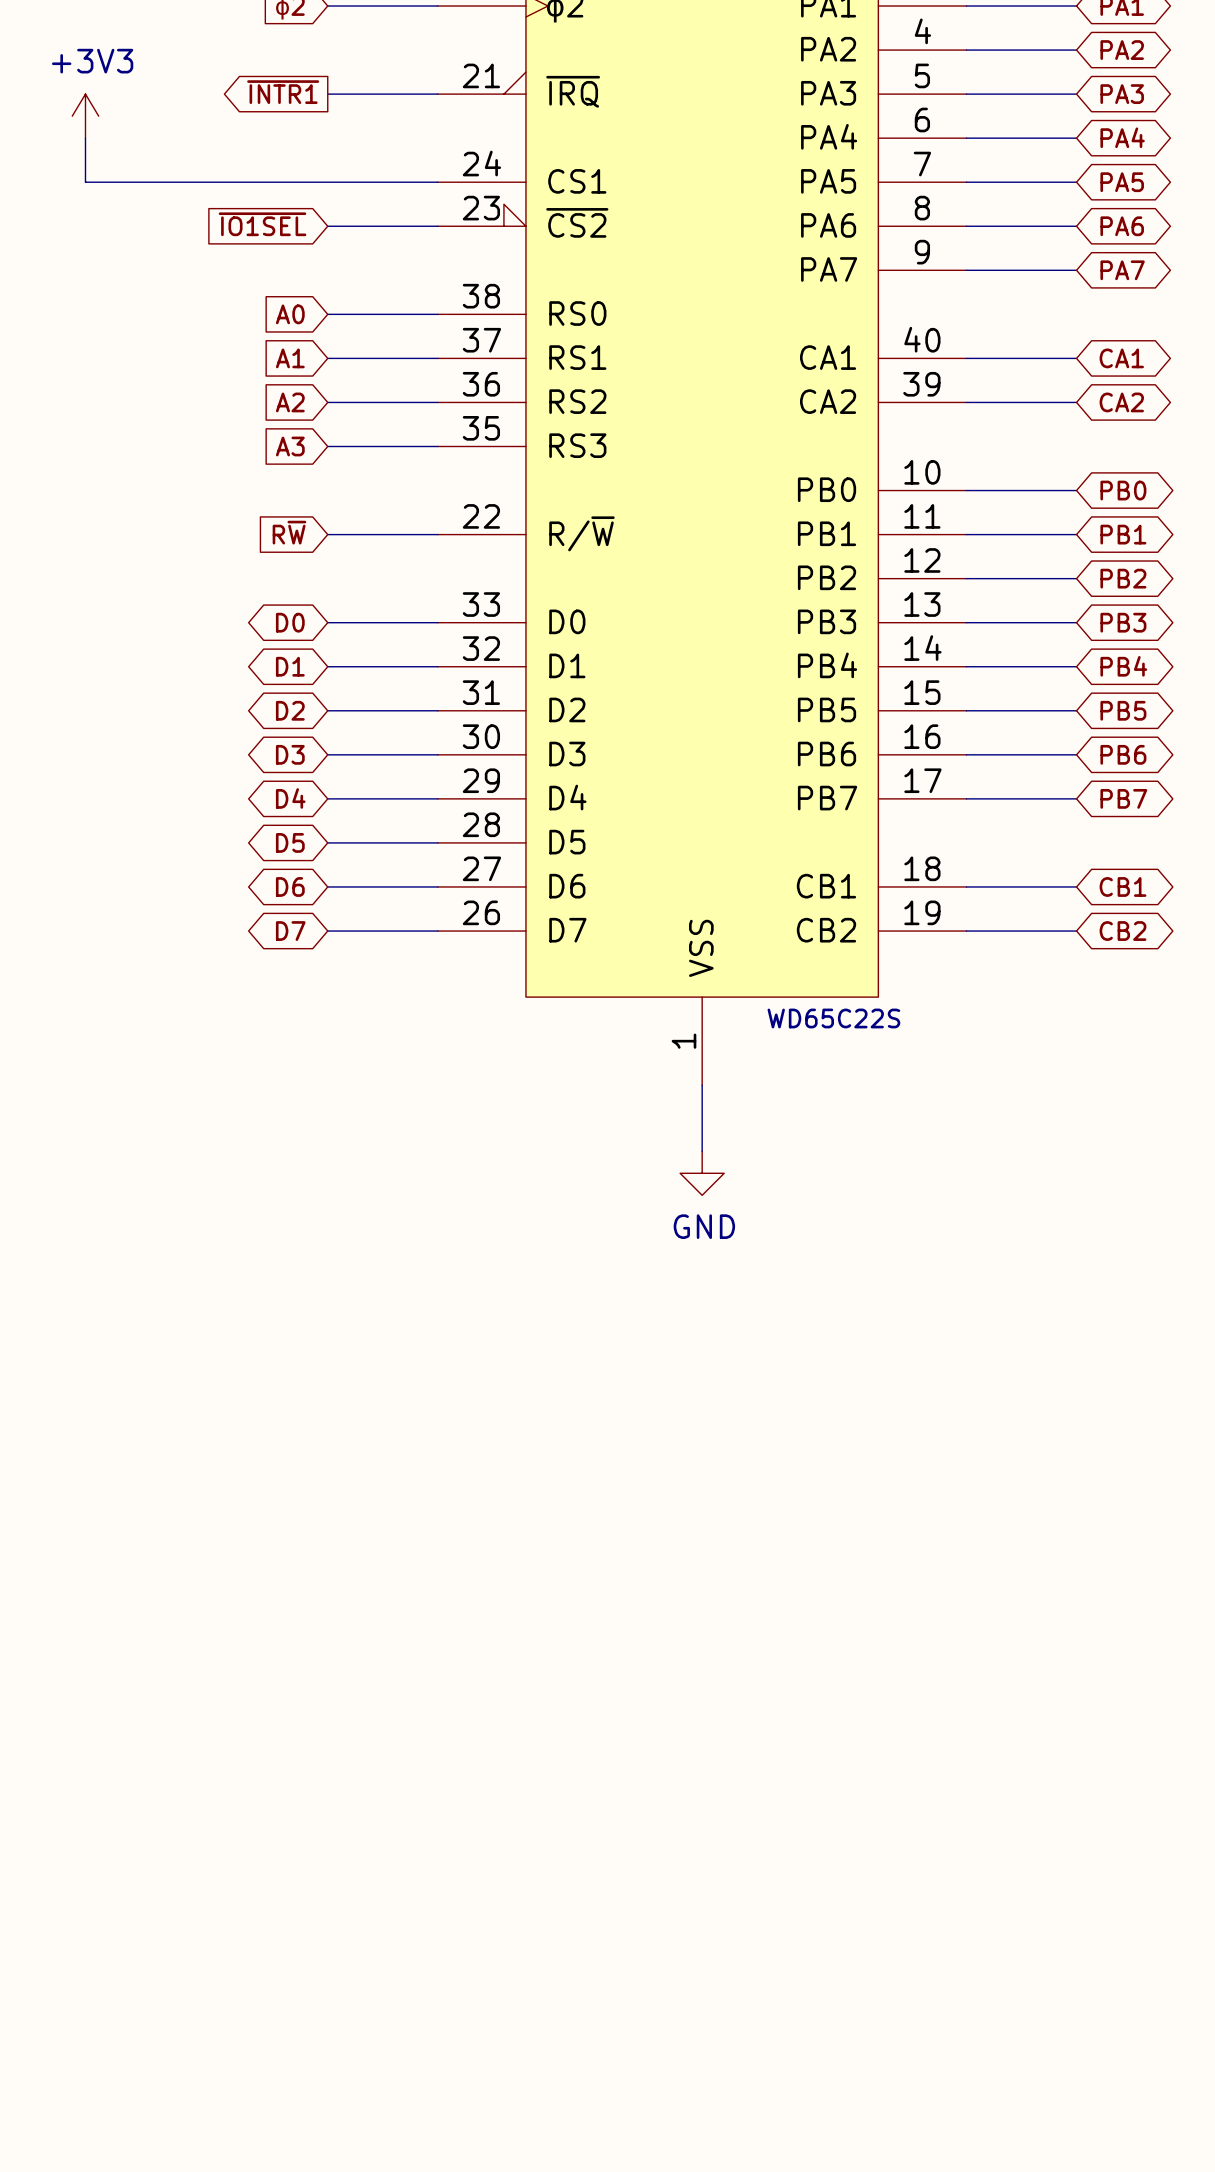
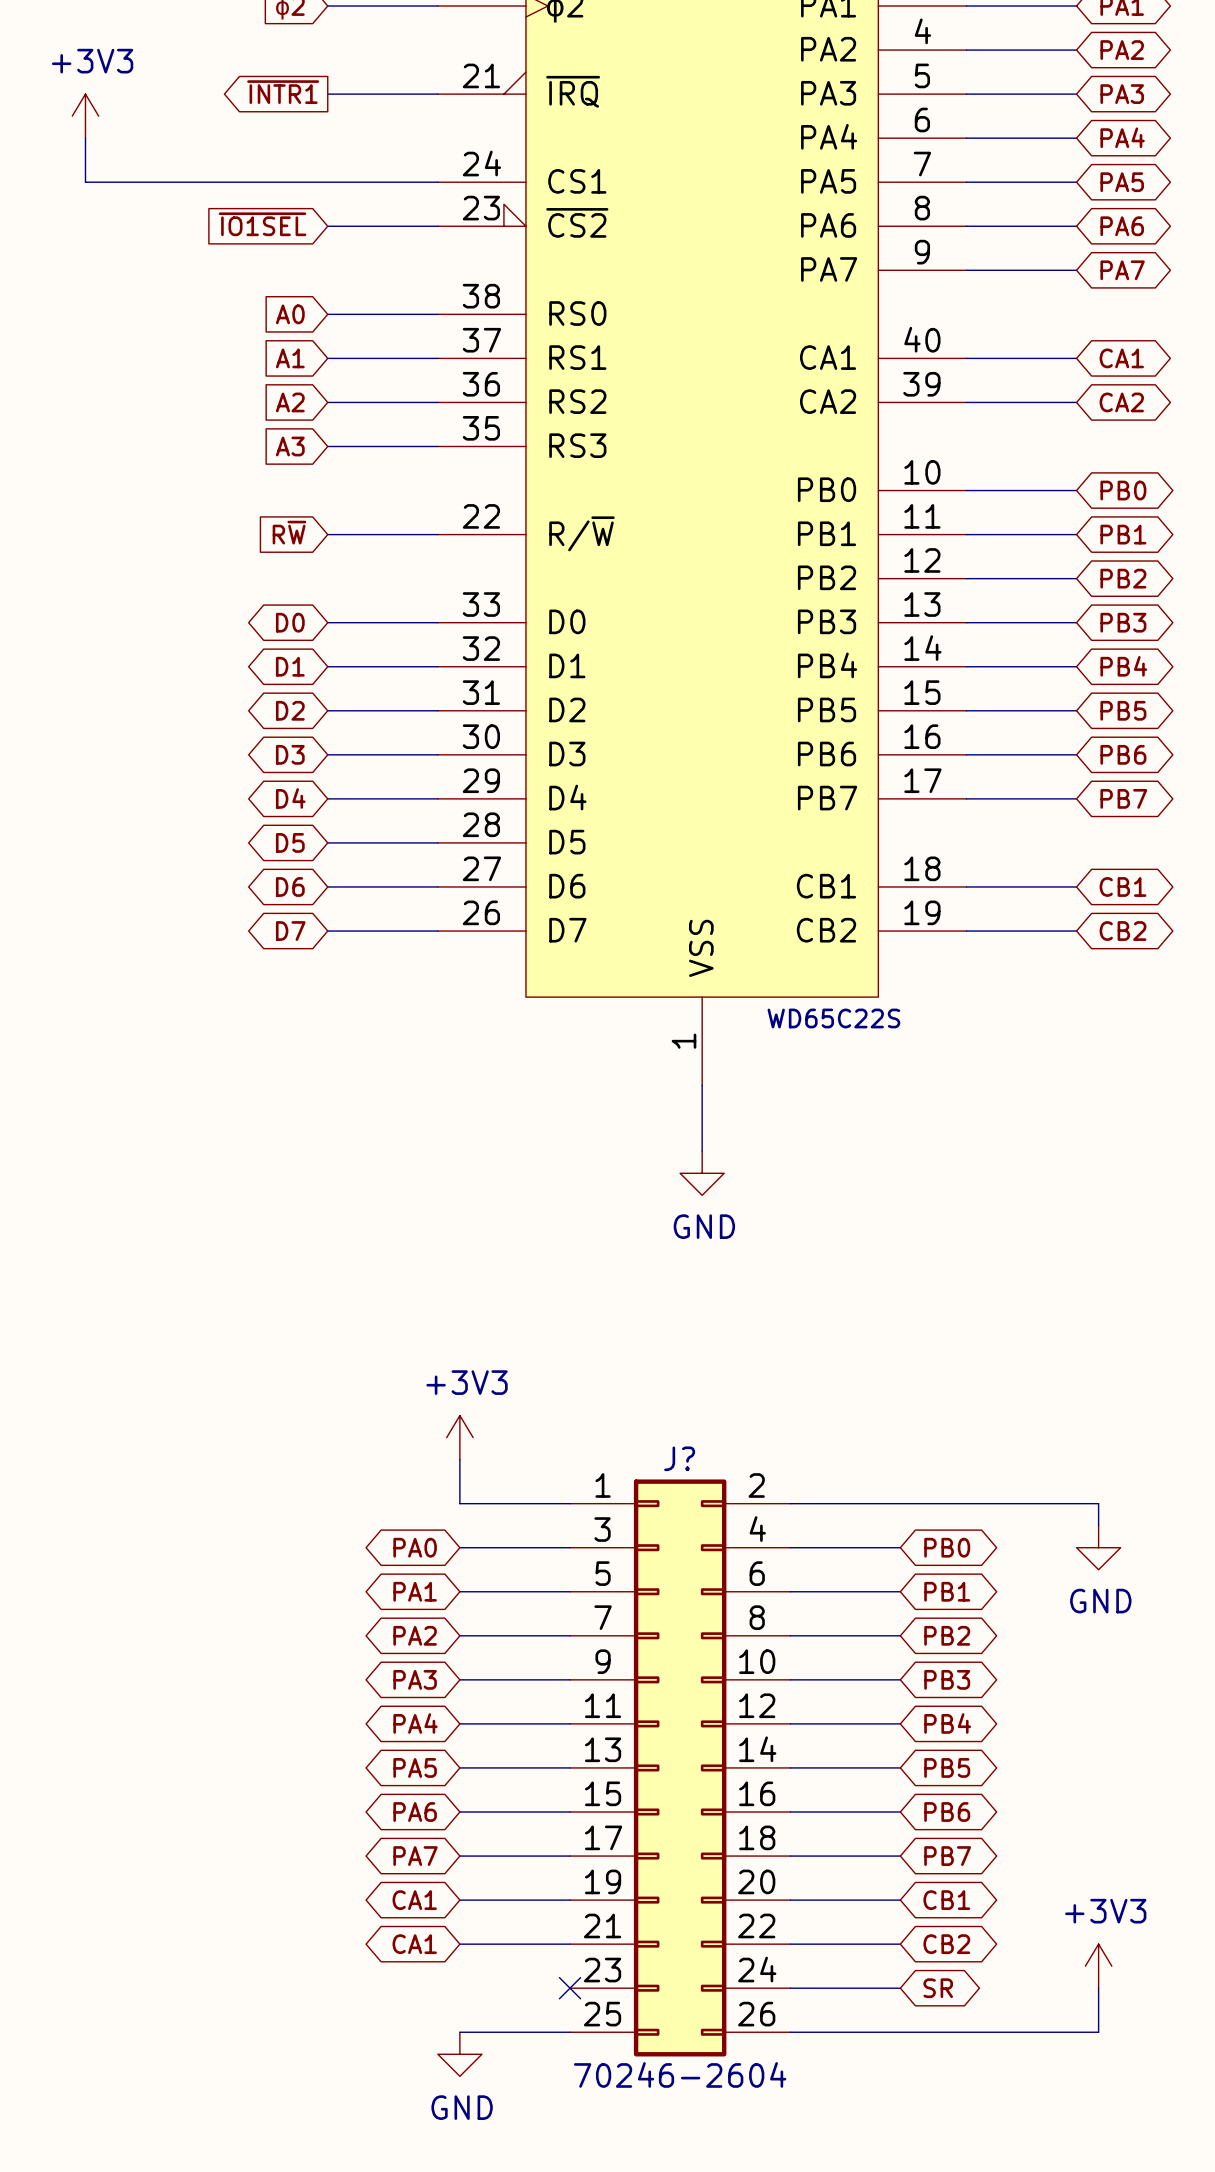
power symbol: none -> +3V3 (459, 1437)
wire: none -> (459, 1459) (459, 1503) (570, 1503)
wire: none -> (790, 1503) (1098, 1503) (1098, 1525)
global label: none -> PA0 (415, 1547)
wire: none -> (459, 1547) (570, 1547)
wire: none -> (790, 1547) (900, 1547)
global label: none -> PB0 (947, 1547)
power symbol: none -> GND (1098, 1547)
global label: none -> PA1 (415, 1591)
wire: none -> (459, 1591) (570, 1591)
wire: none -> (790, 1591) (900, 1591)
global label: none -> PB1 (947, 1591)
global label: none -> PA2 (415, 1635)
wire: none -> (459, 1635) (570, 1635)
wire: none -> (790, 1635) (900, 1635)
global label: none -> PB2 (947, 1635)
global label: none -> PA3 (415, 1679)
wire: none -> (459, 1679) (570, 1679)
wire: none -> (790, 1679) (900, 1679)
global label: none -> PB3 (947, 1679)
global label: none -> PA4 (415, 1723)
wire: none -> (459, 1723) (570, 1723)
wire: none -> (790, 1723) (900, 1723)
global label: none -> PB4 (947, 1723)
global label: none -> PA5 (415, 1767)
wire: none -> (459, 1767) (570, 1767)
J?: none -> 70246-2604 (680, 1767)
wire: none -> (790, 1767) (900, 1767)
global label: none -> PB5 (947, 1767)
global label: none -> PA6 (415, 1812)
wire: none -> (459, 1812) (570, 1812)
wire: none -> (790, 1812) (900, 1812)
global label: none -> PB6 (947, 1812)
global label: none -> PA7 (415, 1856)
wire: none -> (459, 1856) (570, 1856)
wire: none -> (790, 1856) (900, 1856)
global label: none -> PB7 (947, 1856)
global label: none -> CA1 (414, 1900)
wire: none -> (459, 1900) (570, 1900)
wire: none -> (790, 1900) (900, 1900)
global label: none -> CB1 (946, 1900)
global label: none -> CA1 (414, 1944)
wire: none -> (459, 1944) (570, 1944)
wire: none -> (790, 1944) (900, 1944)
global label: none -> CB2 (946, 1944)
power symbol: none -> +3V3 (1098, 1966)
no-connect mark: none -> (570, 1988)
wire: none -> (790, 1988) (900, 1988)
global label: none -> SR (938, 1988)
wire: none -> (1098, 1988) (1098, 2032) (790, 2032)
wire: none -> (459, 2032) (570, 2032)
power symbol: none -> GND (459, 2054)

